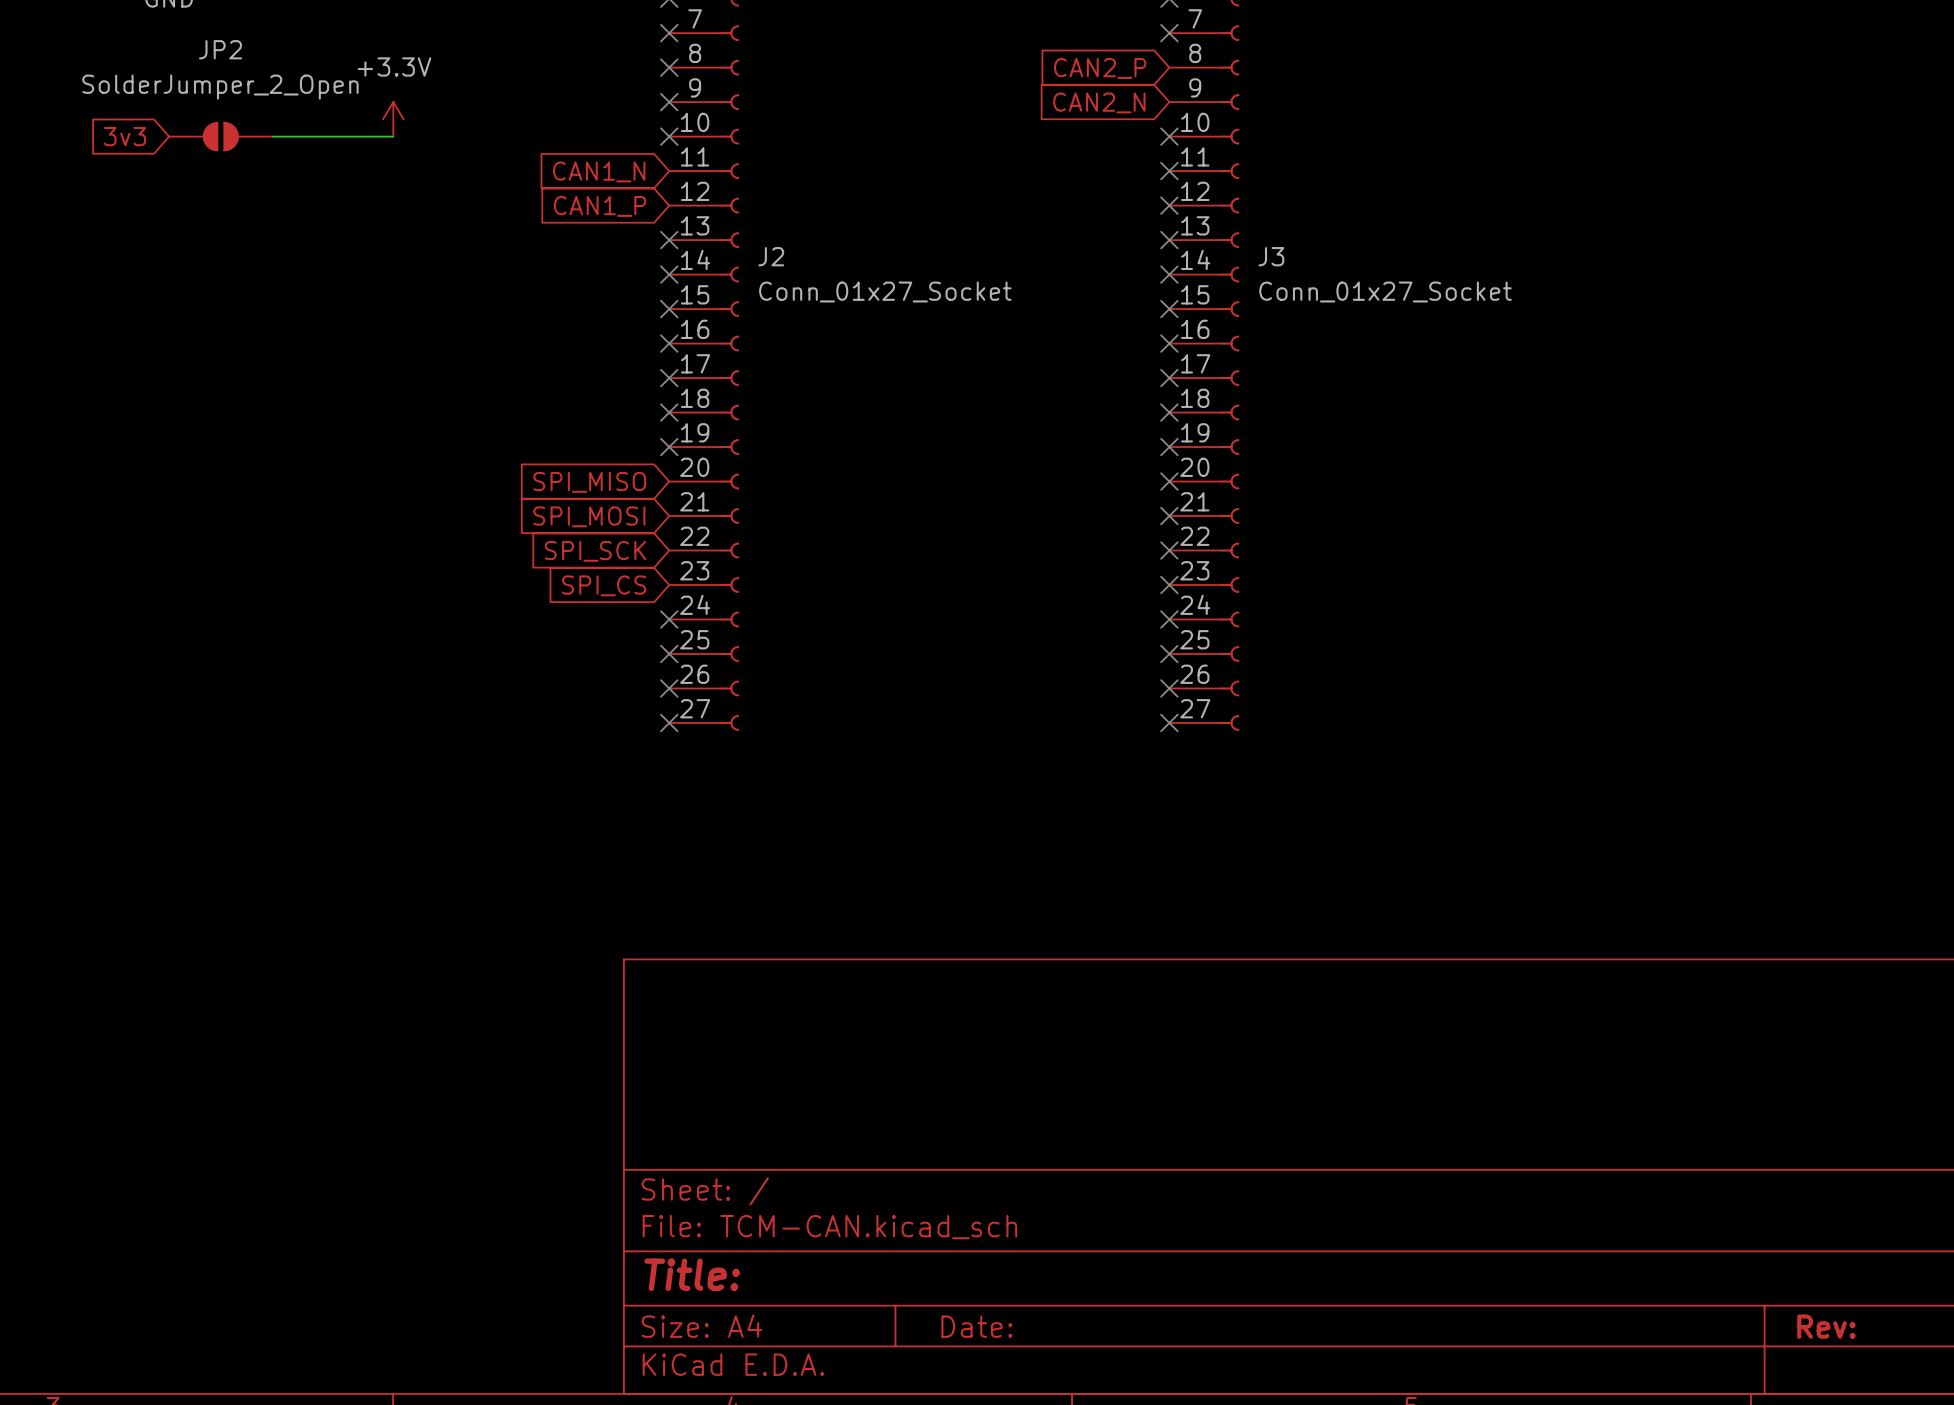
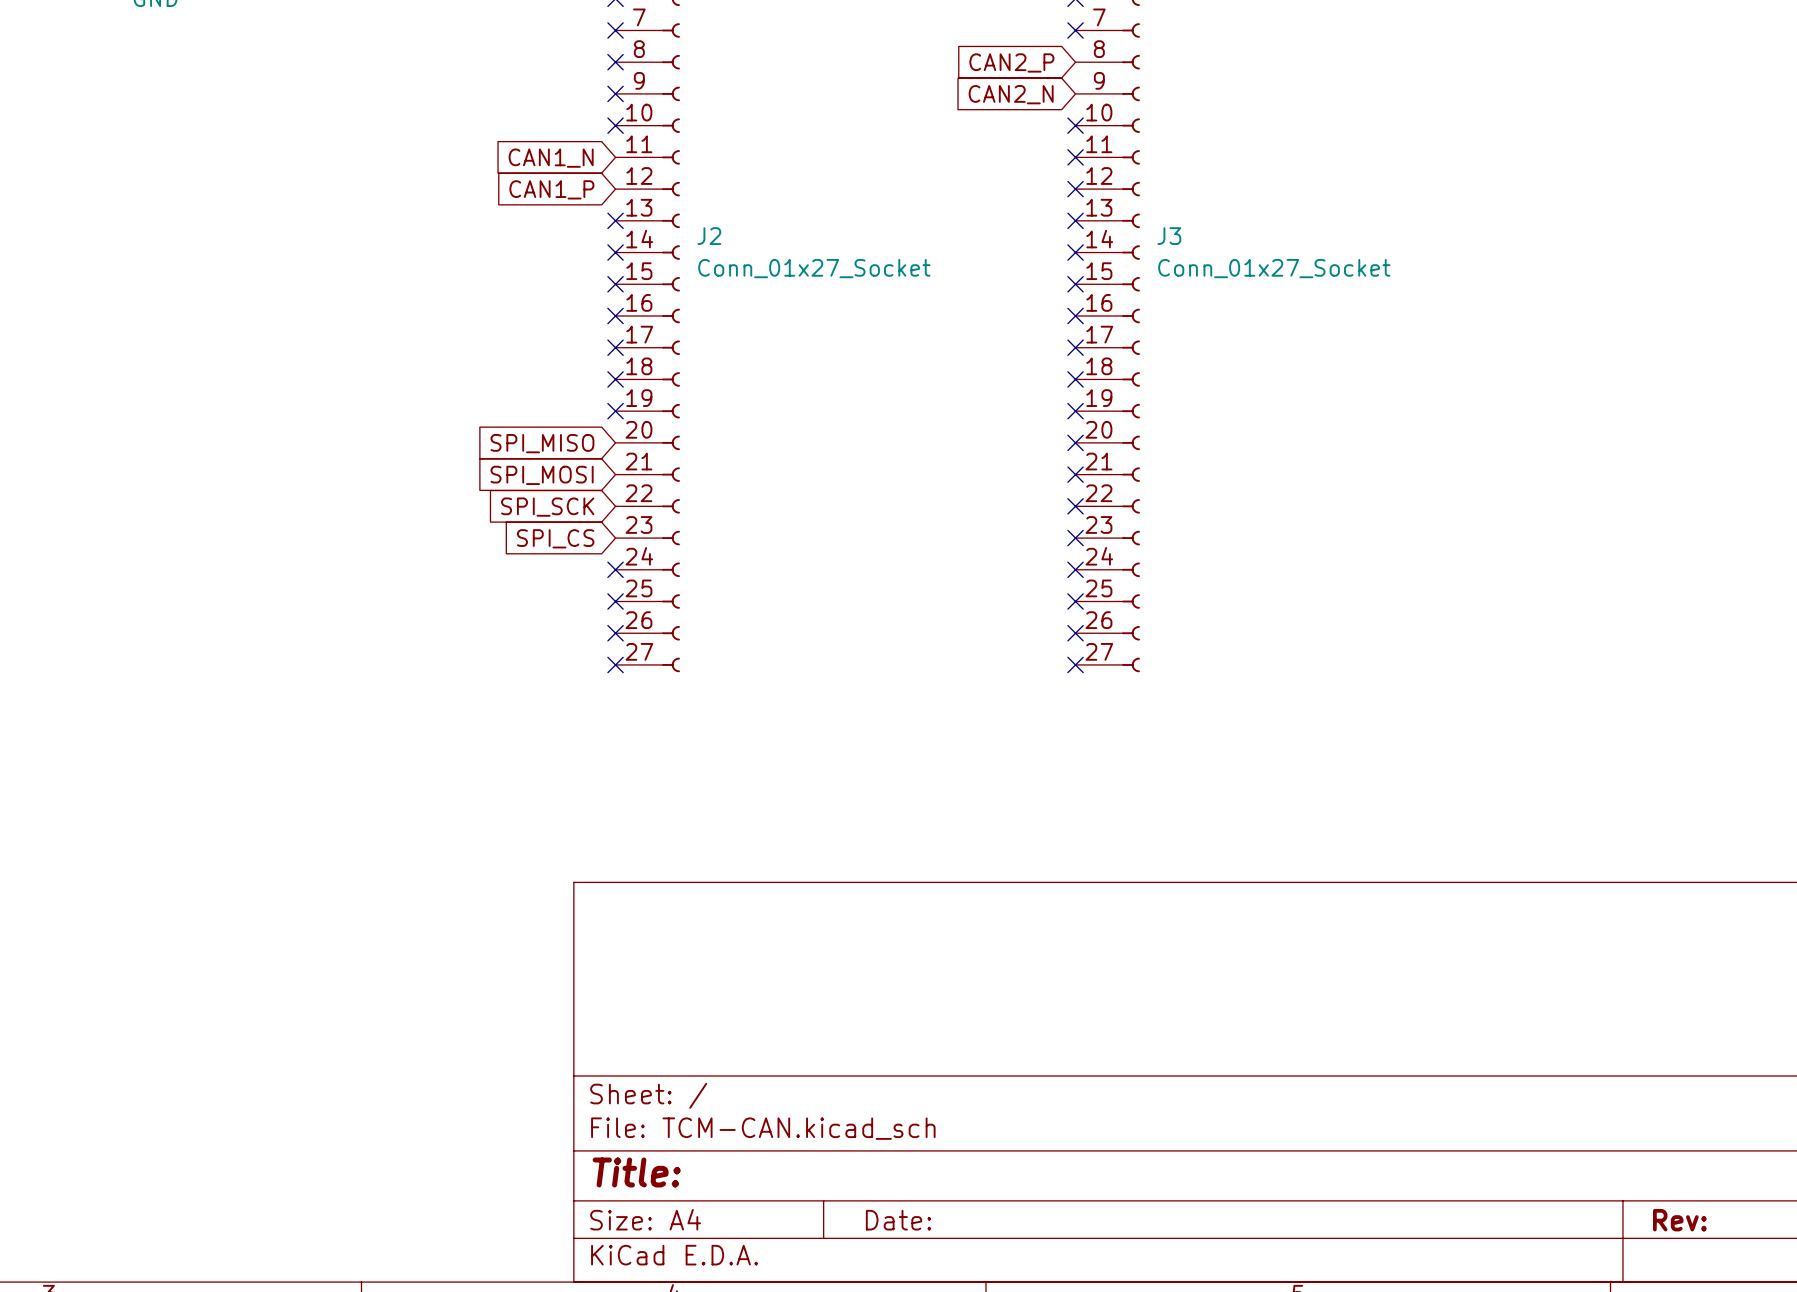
power symbol: +3.3V (393, 119) -> none
global label: 3v3 (124, 136) -> none
JP2: SolderJumper_2_Open (220, 136) -> none
wire: (272, 136) (393, 136) -> none

